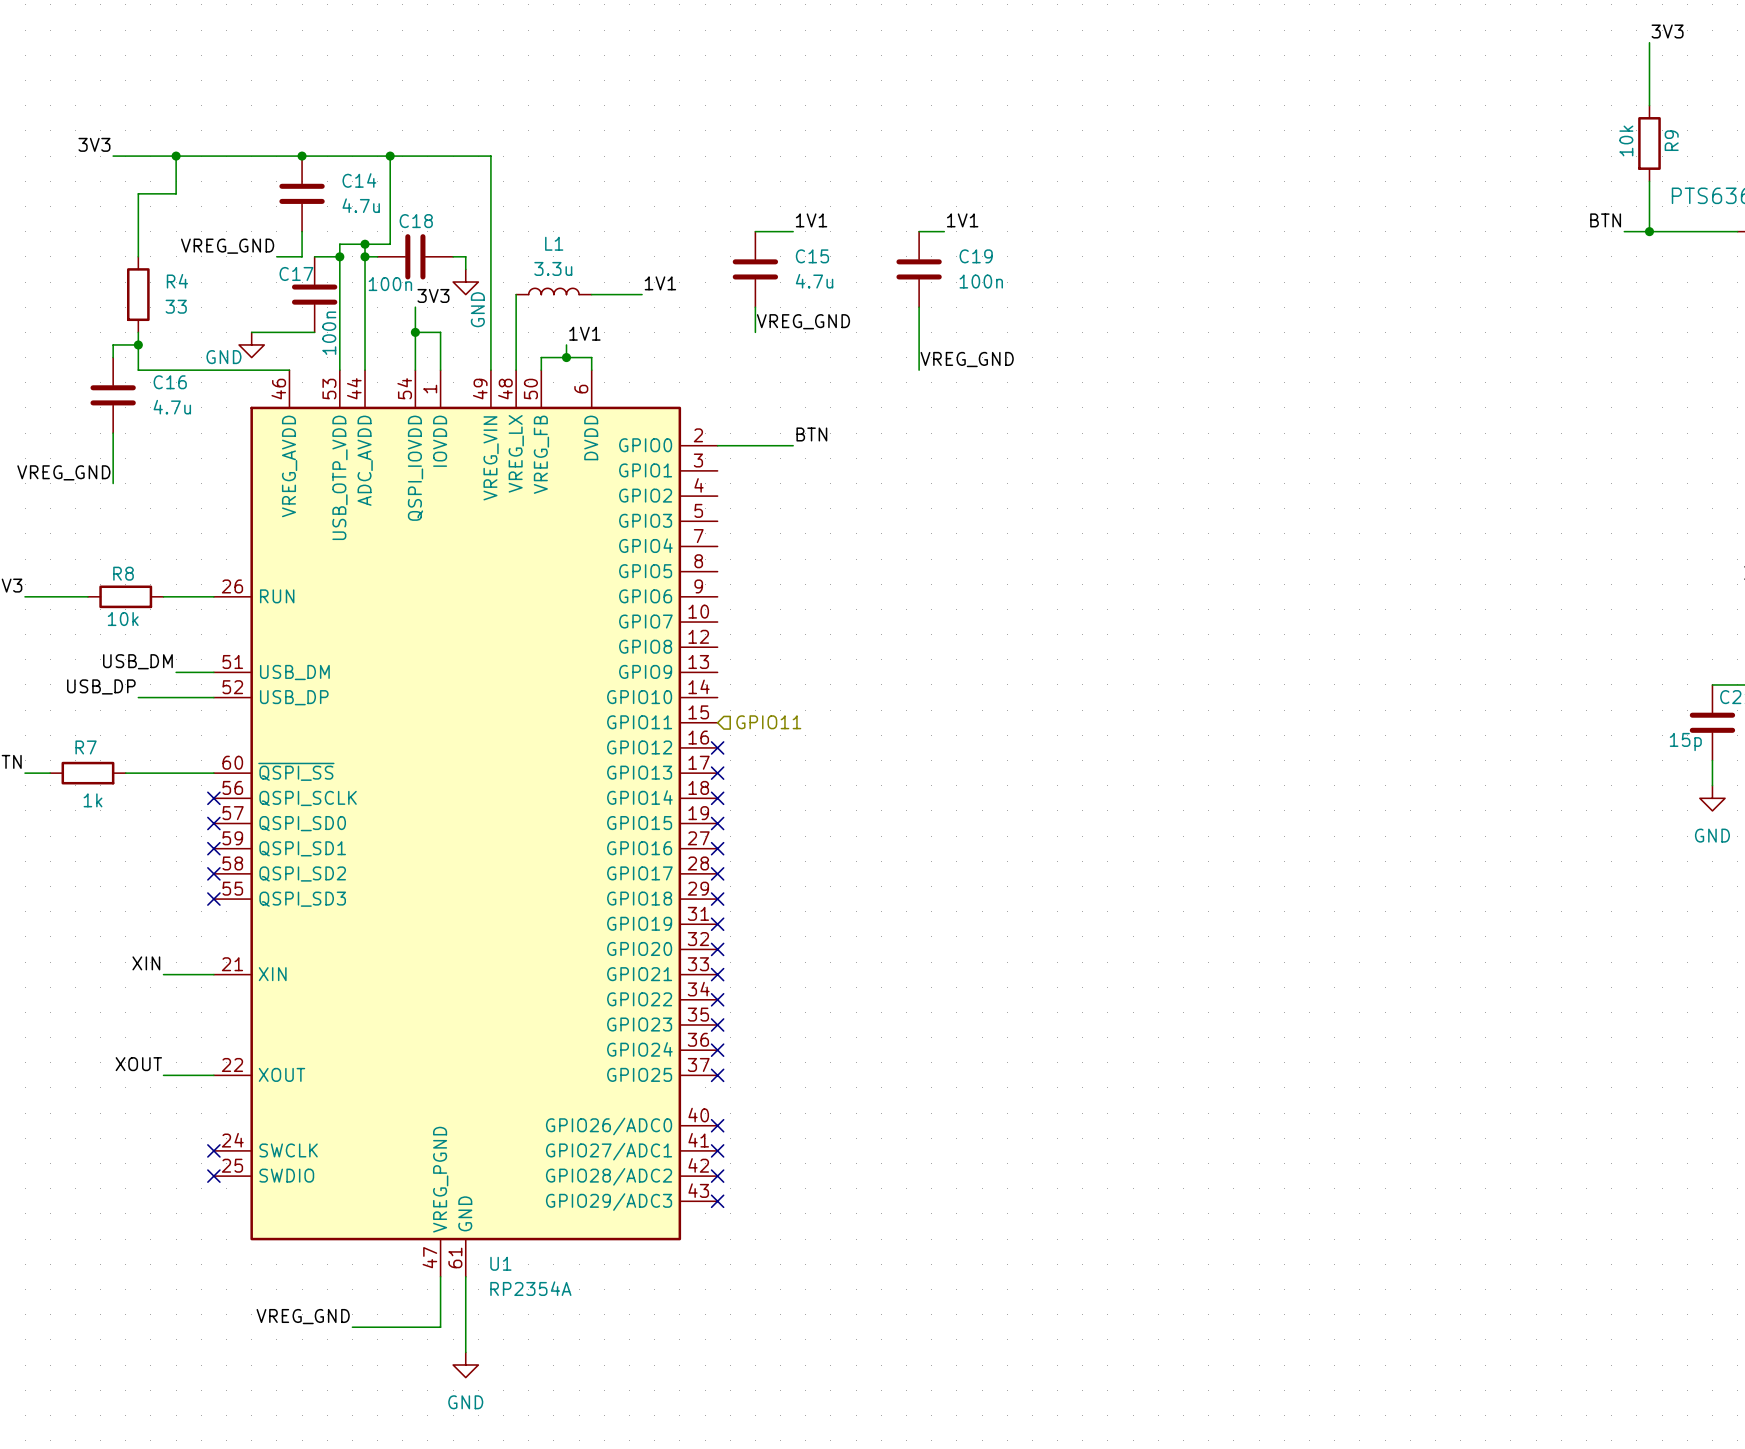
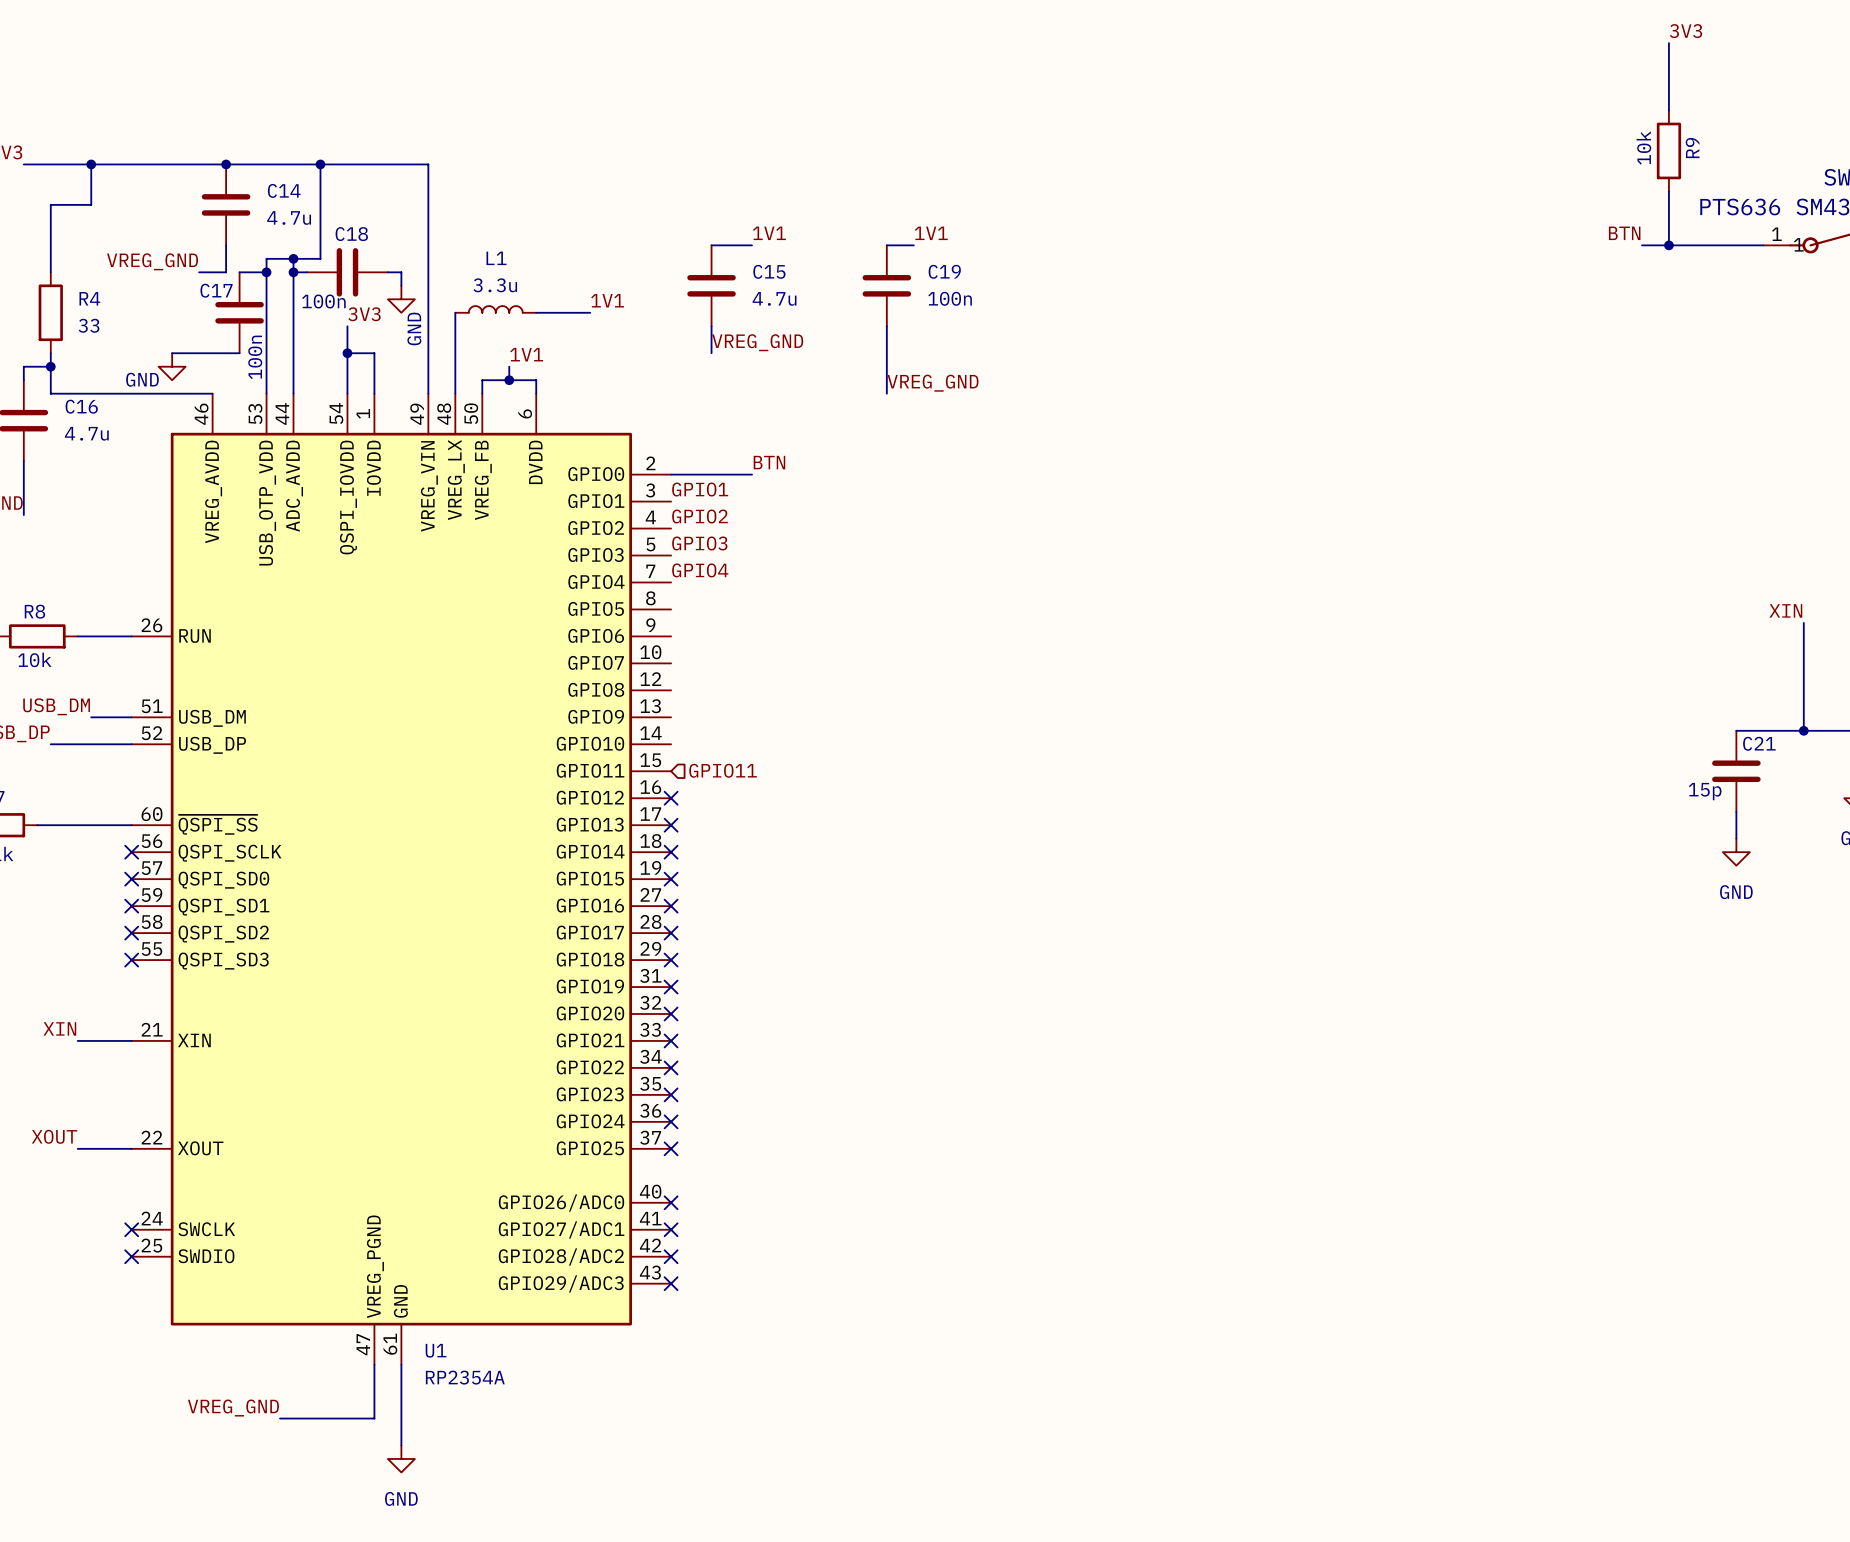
label: none -> GPIO1 (700, 489)
label: none -> GPIO2 (700, 516)
label: none -> GPIO3 (699, 543)
label: none -> GPIO4 (700, 570)

